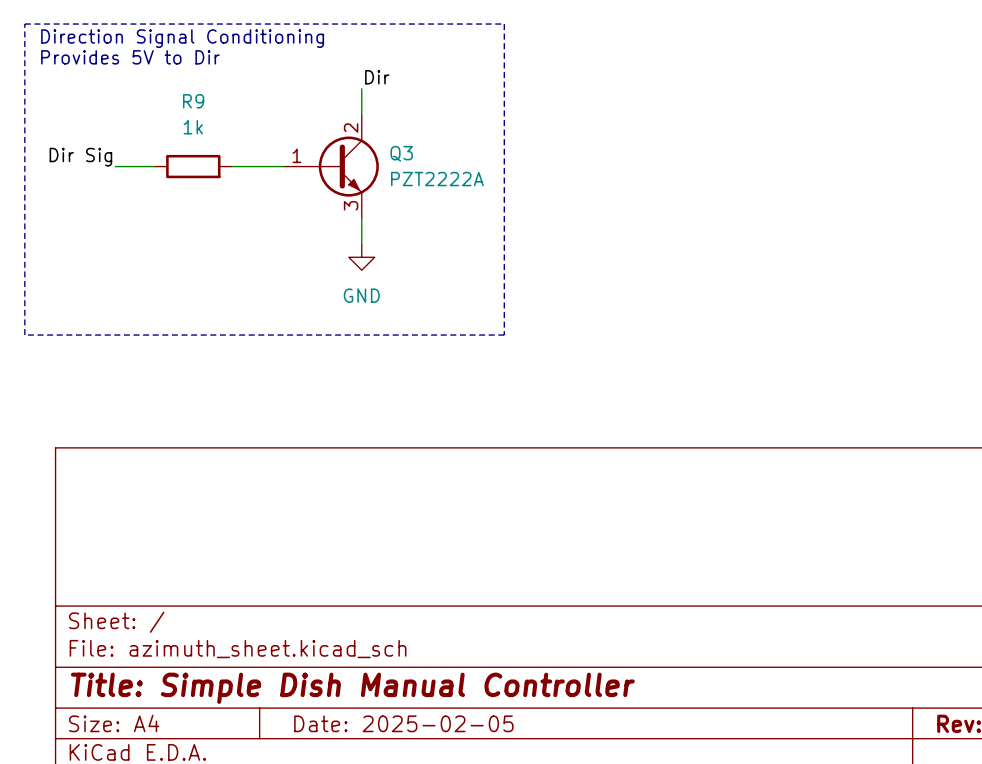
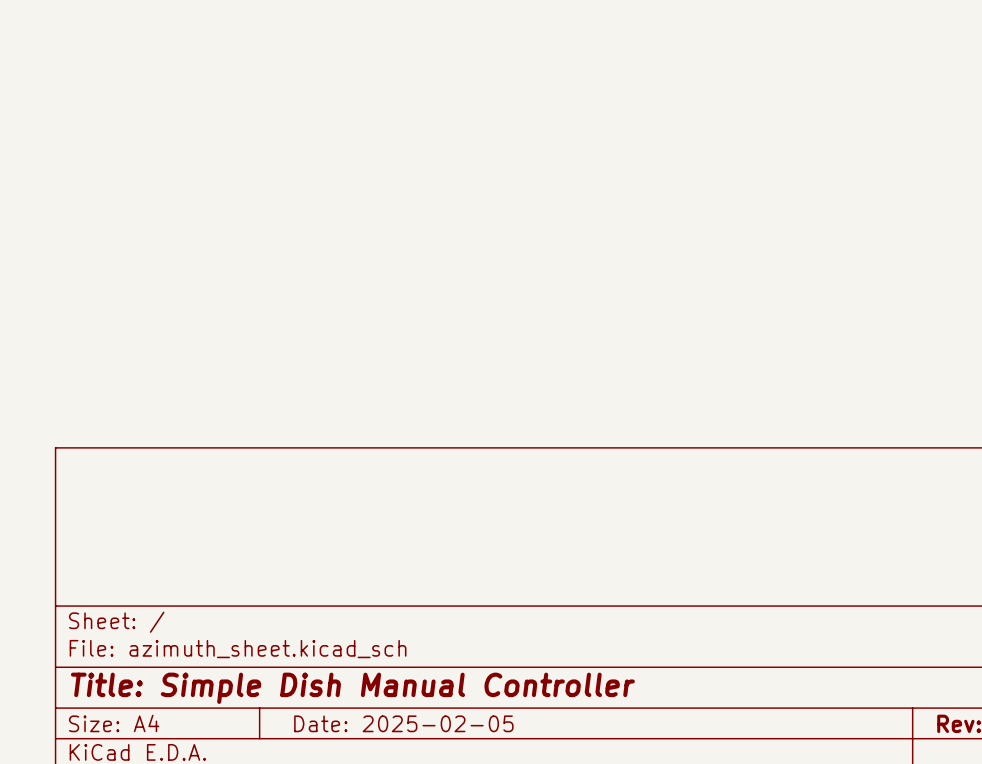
line: (24, 24) (504, 24) (504, 335) (24, 335) (24, 24) -> none
text: Direction Signal Conditioning (182, 38) -> none
text: Provides 5V to Dir (130, 57) -> none
label: Dir (377, 77) -> none
wire: (361, 88) (361, 114) -> none
label: Dir Sig (80, 157) -> none
wire: (115, 166) (154, 166) -> none
R9: 1k (193, 166) -> none
wire: (232, 166) (284, 166) -> none
Q3: PZT2222A (331, 166) -> none
wire: (361, 218) (361, 244) -> none
power symbol: GND (361, 257) -> none

